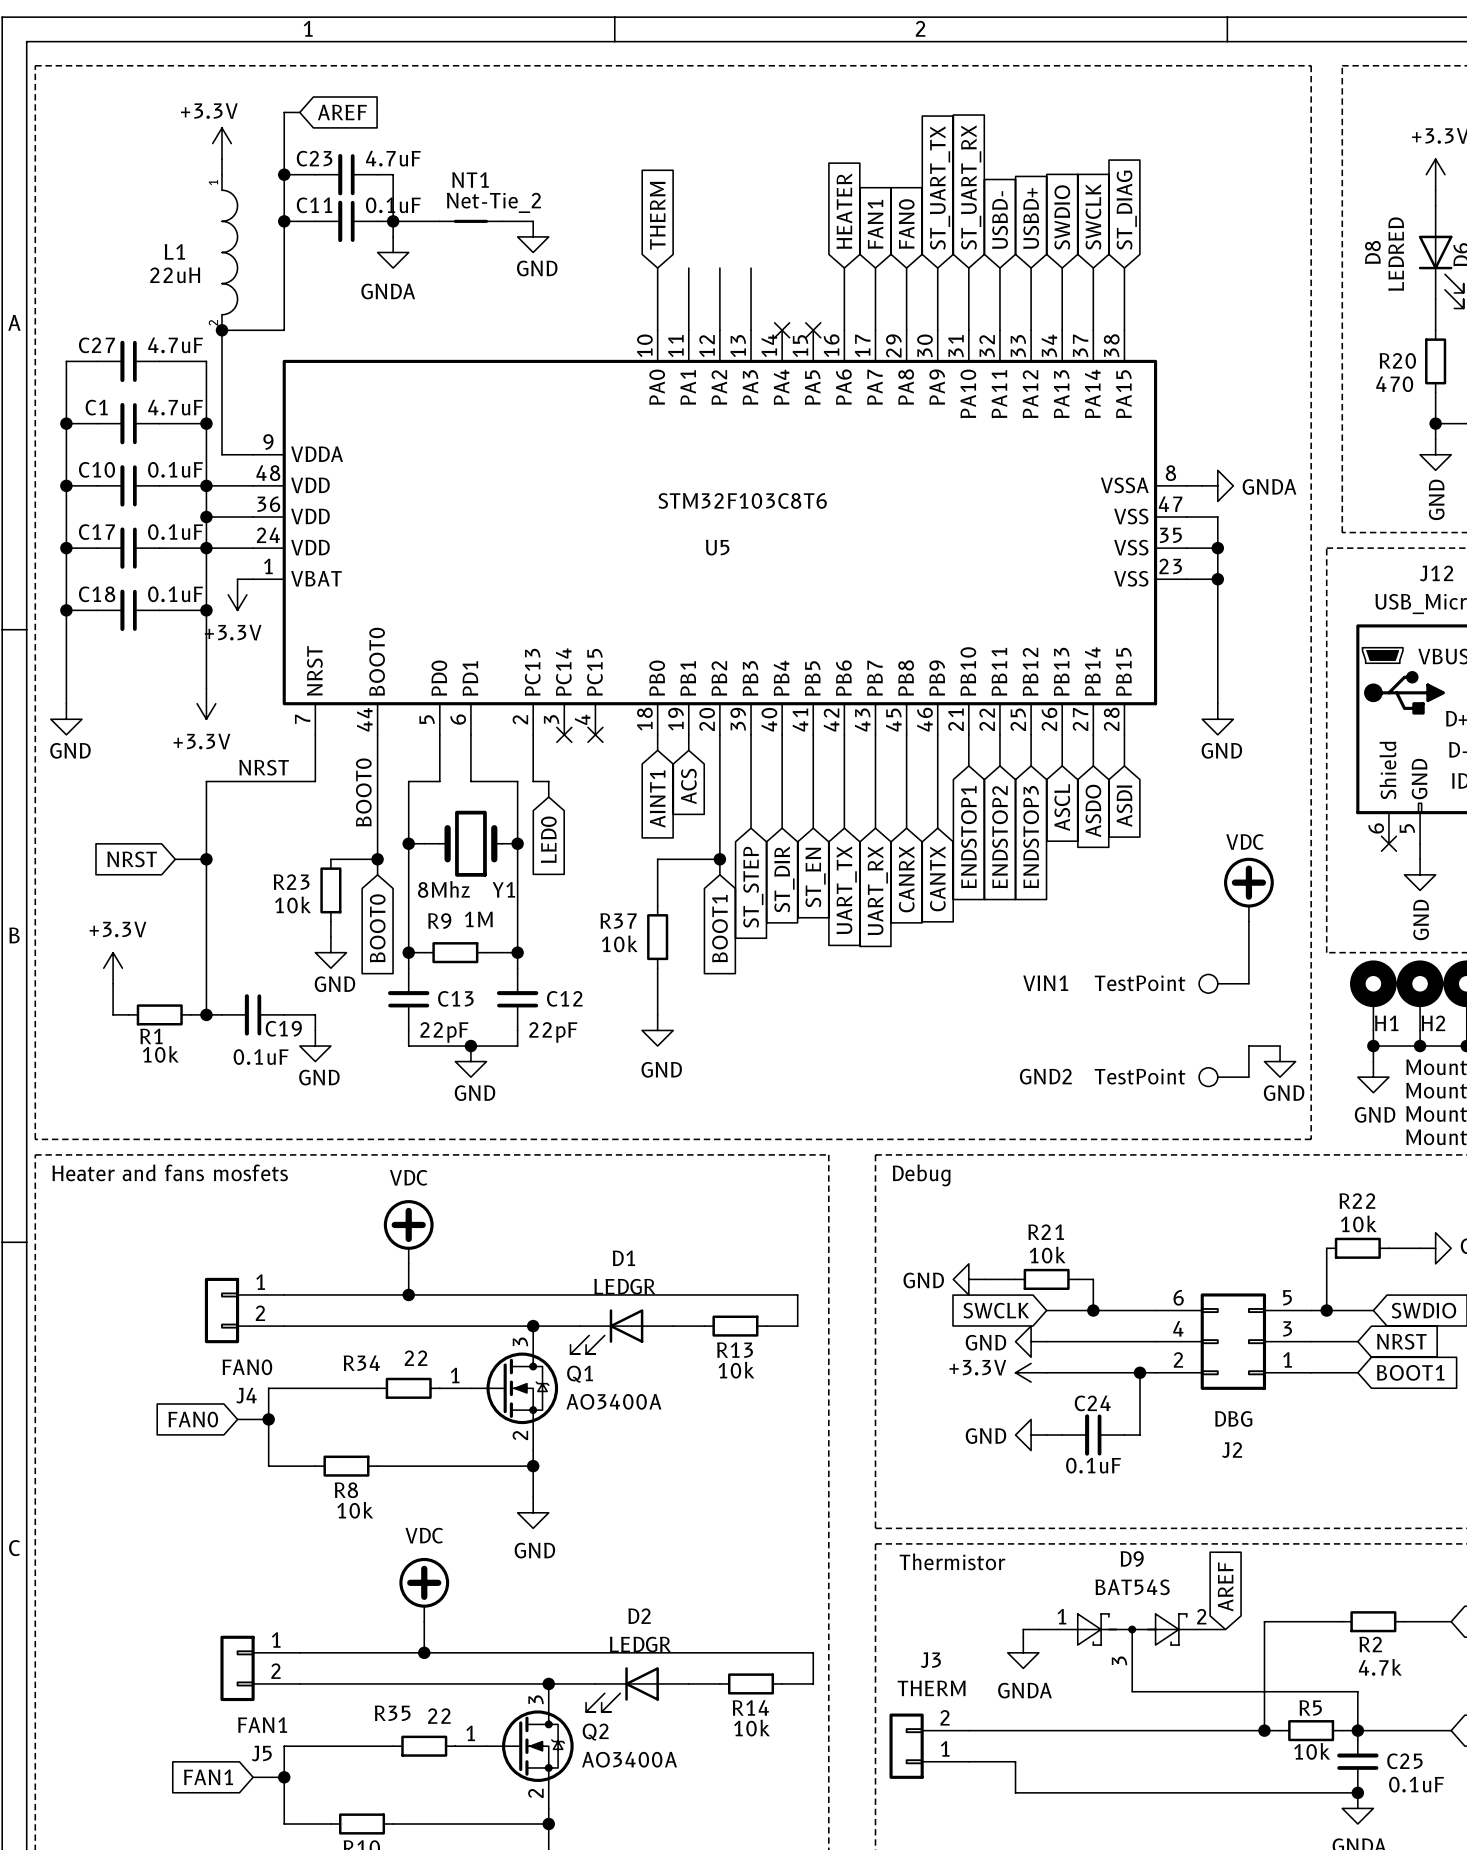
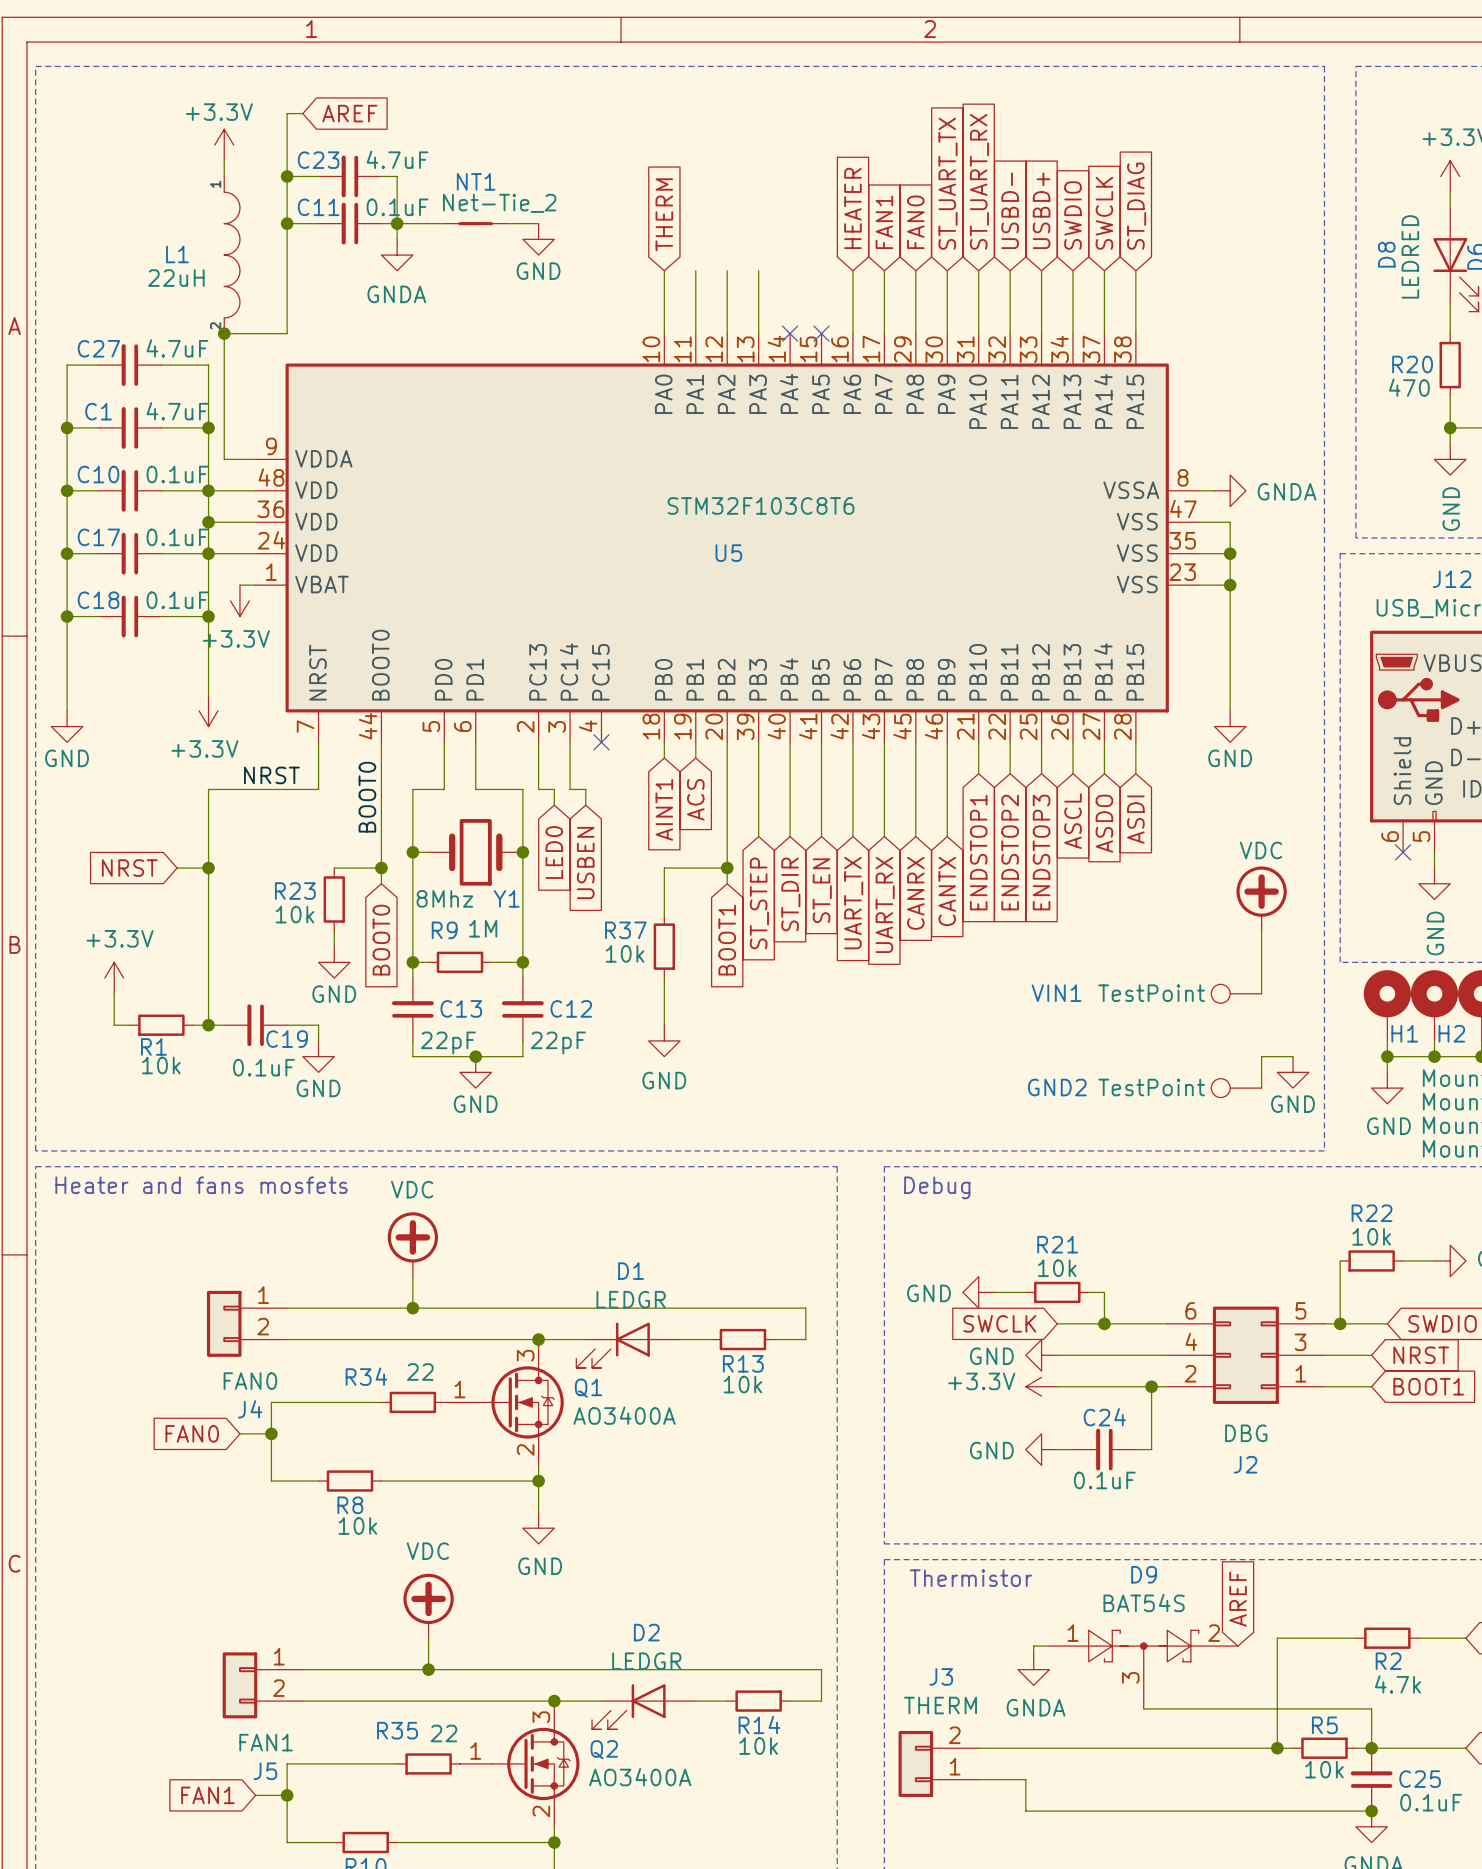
wire: none -> (570, 742) (570, 789) (585, 789) (585, 805)
no-connect mark: (564, 734) -> none
global label: none -> USBEN (585, 863)

